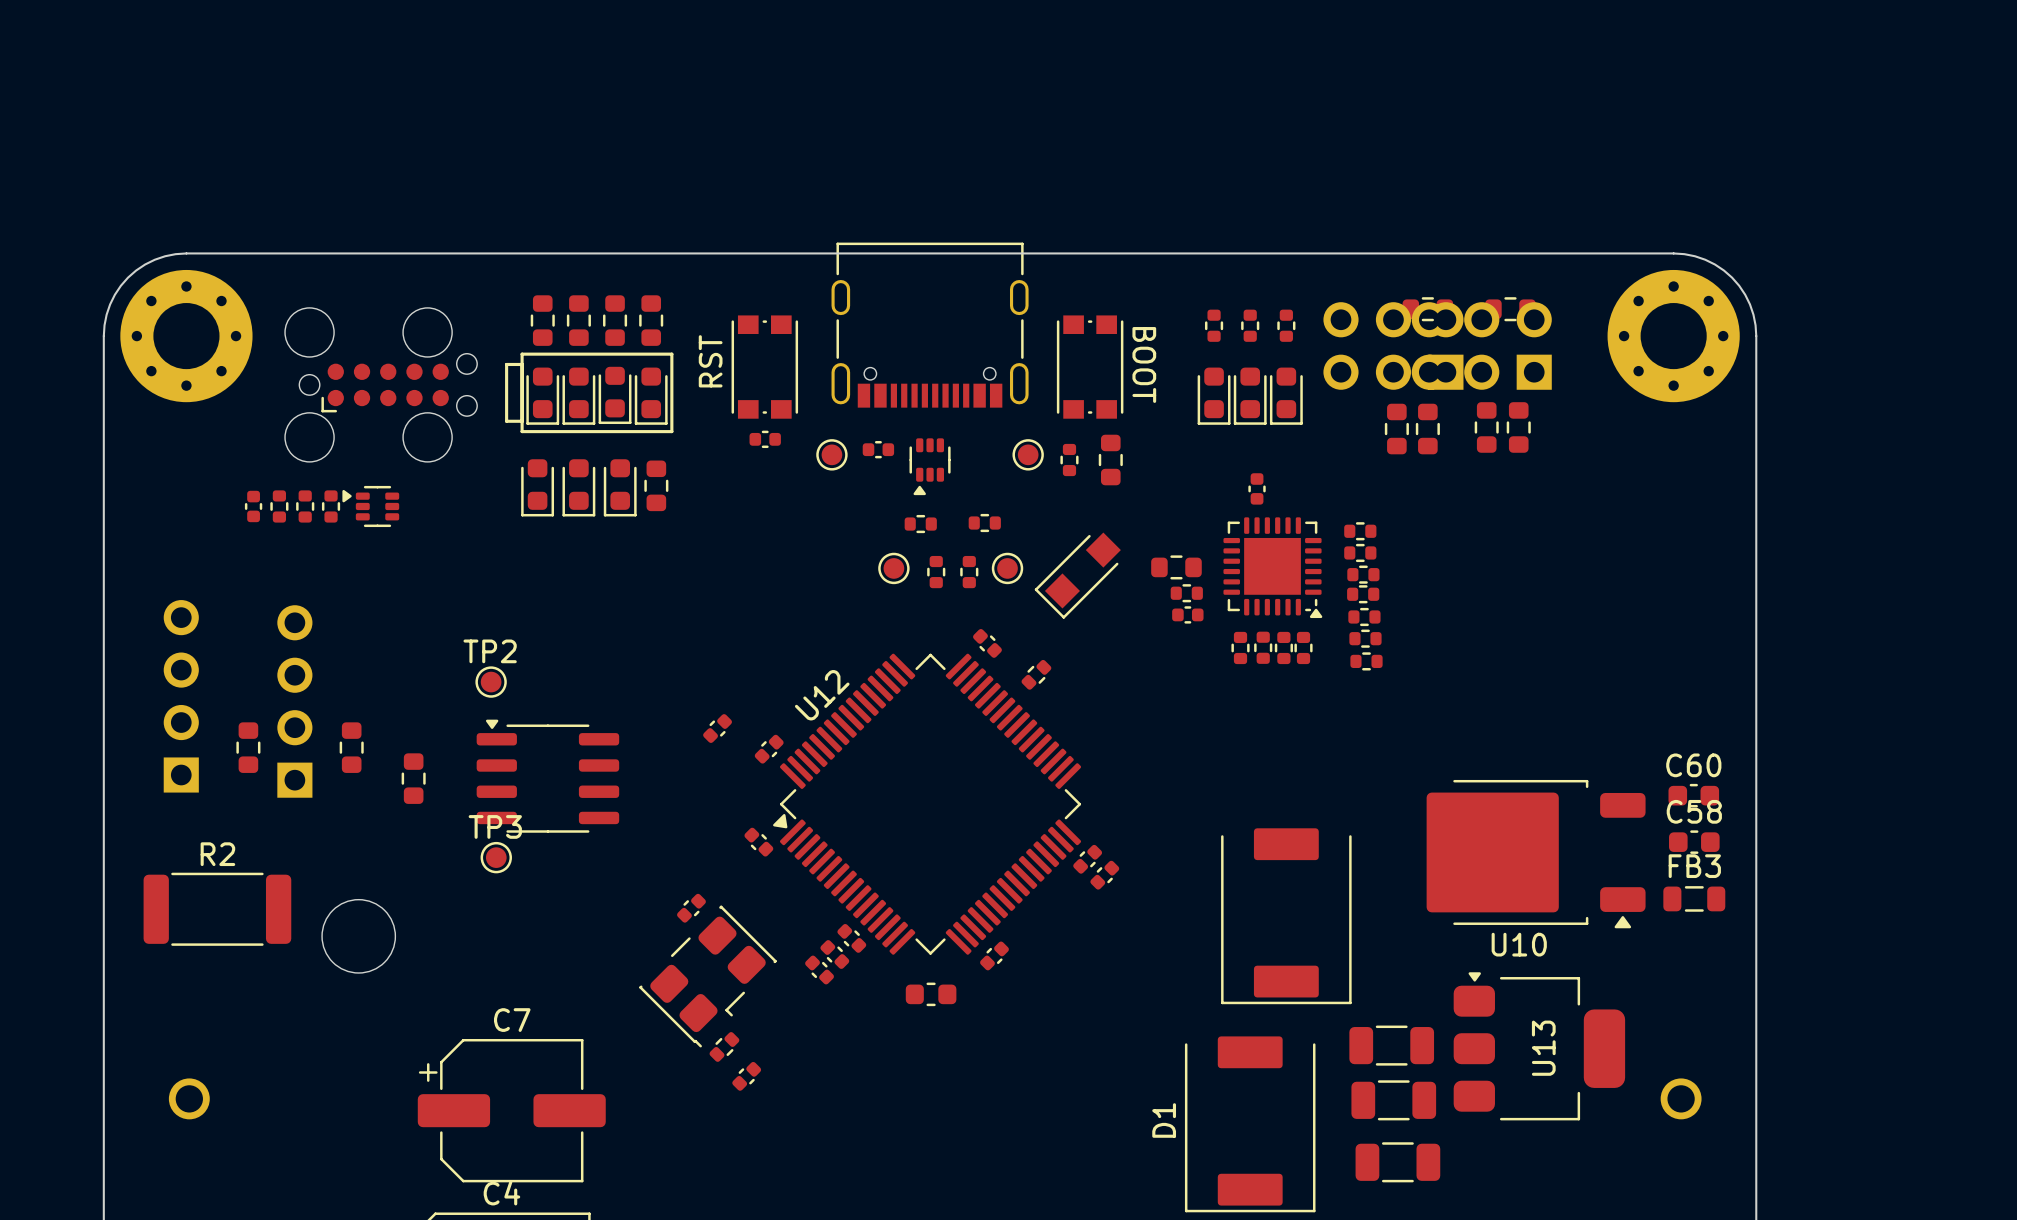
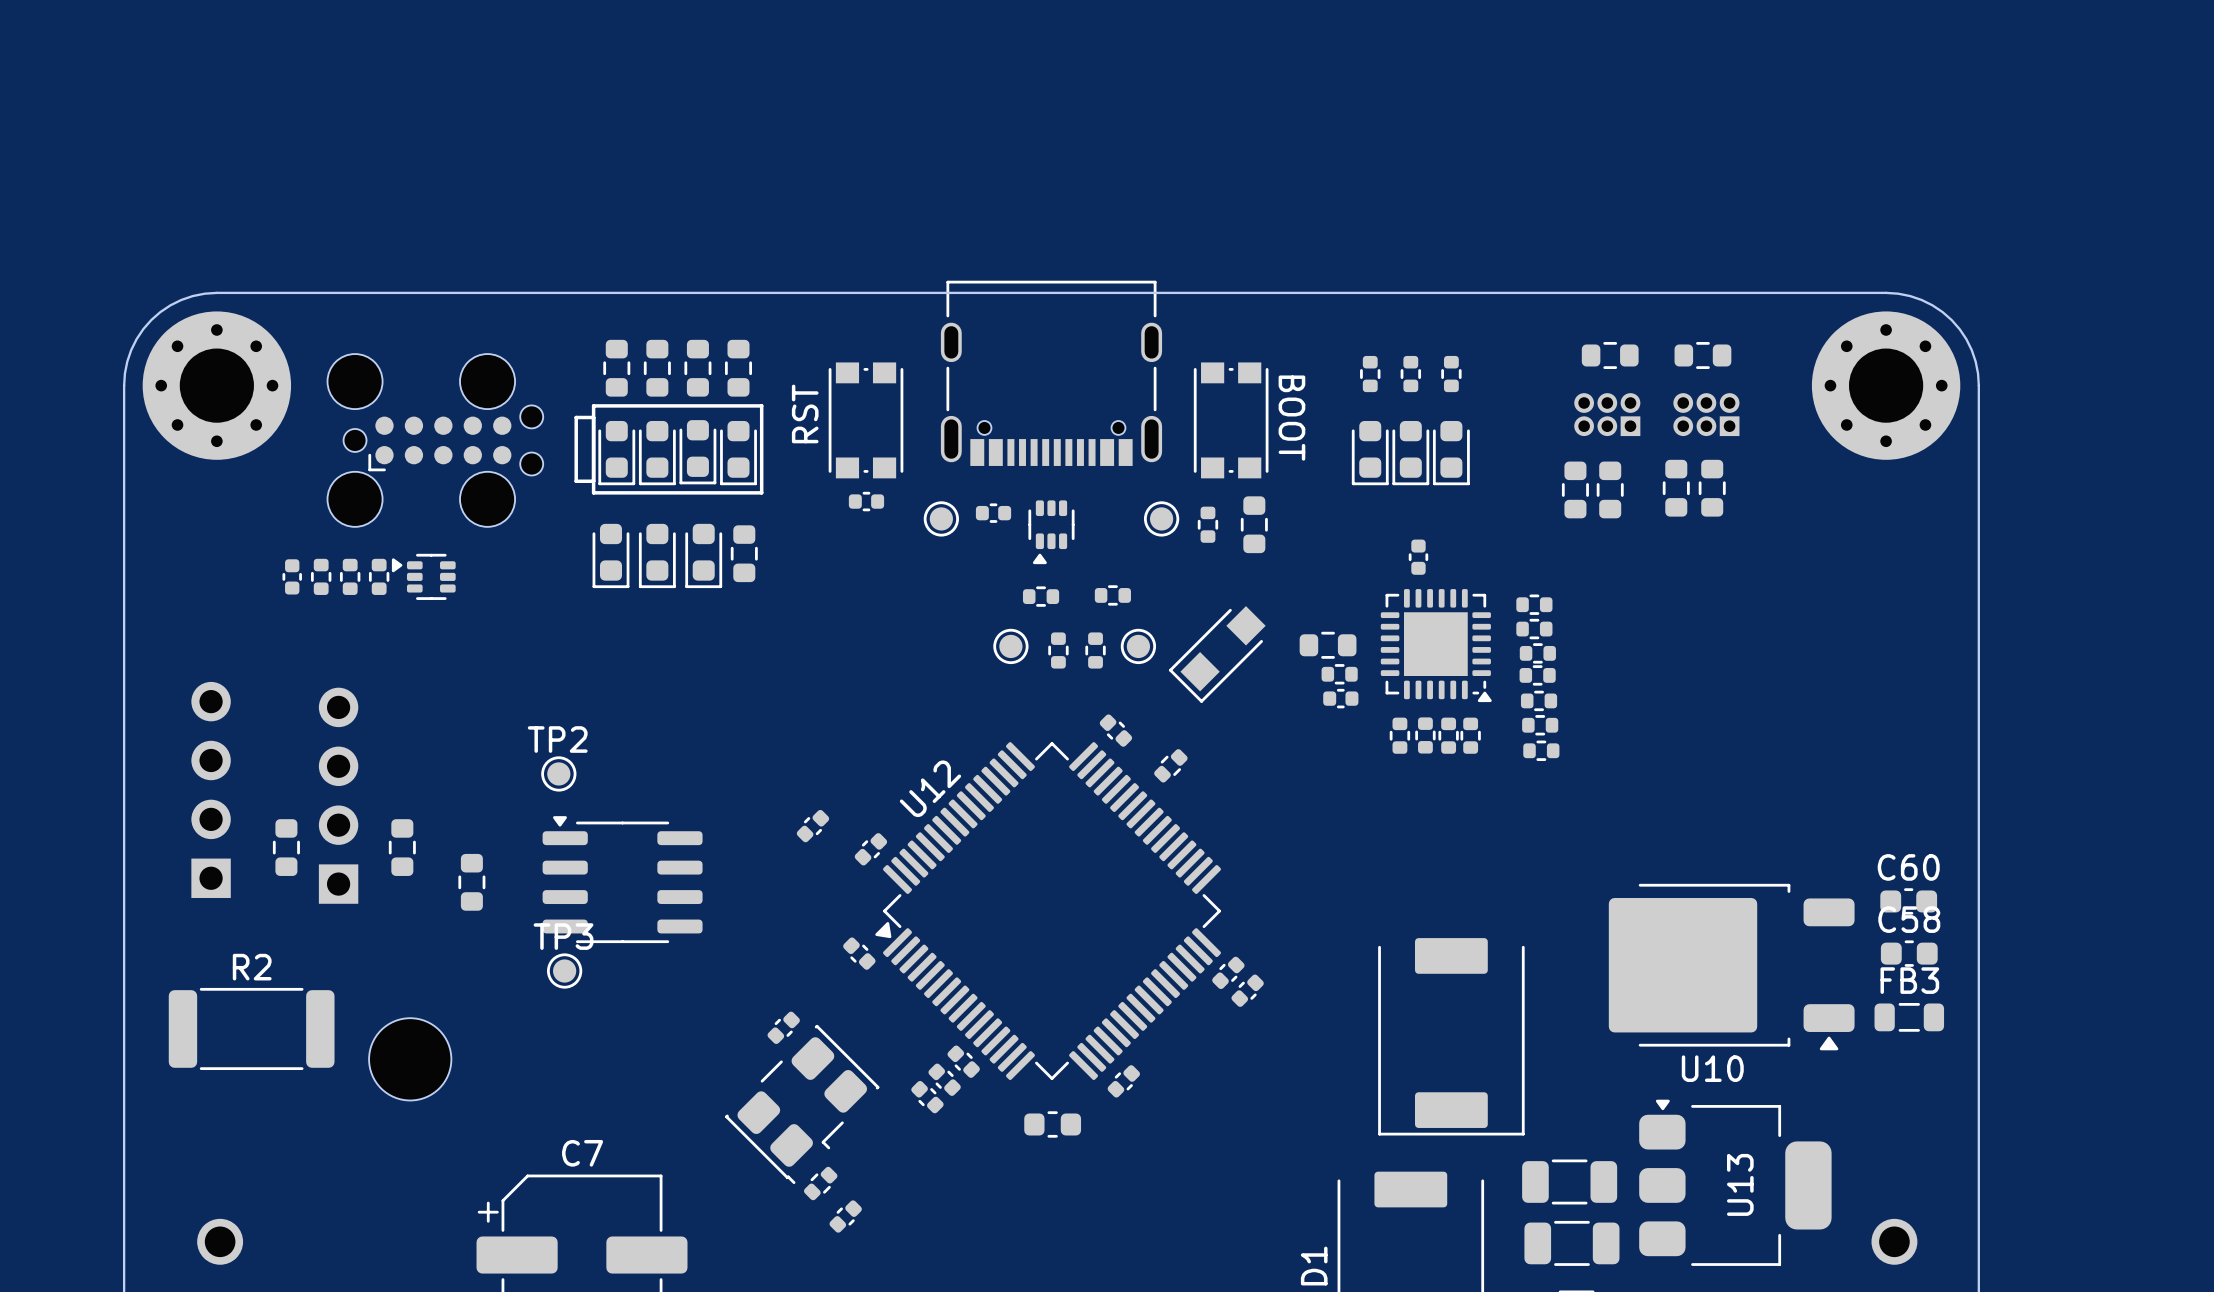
part: (1393, 345) -> none
part: (1481, 345) -> none
part: none -> (1607, 414)
part: none -> (1706, 414)

